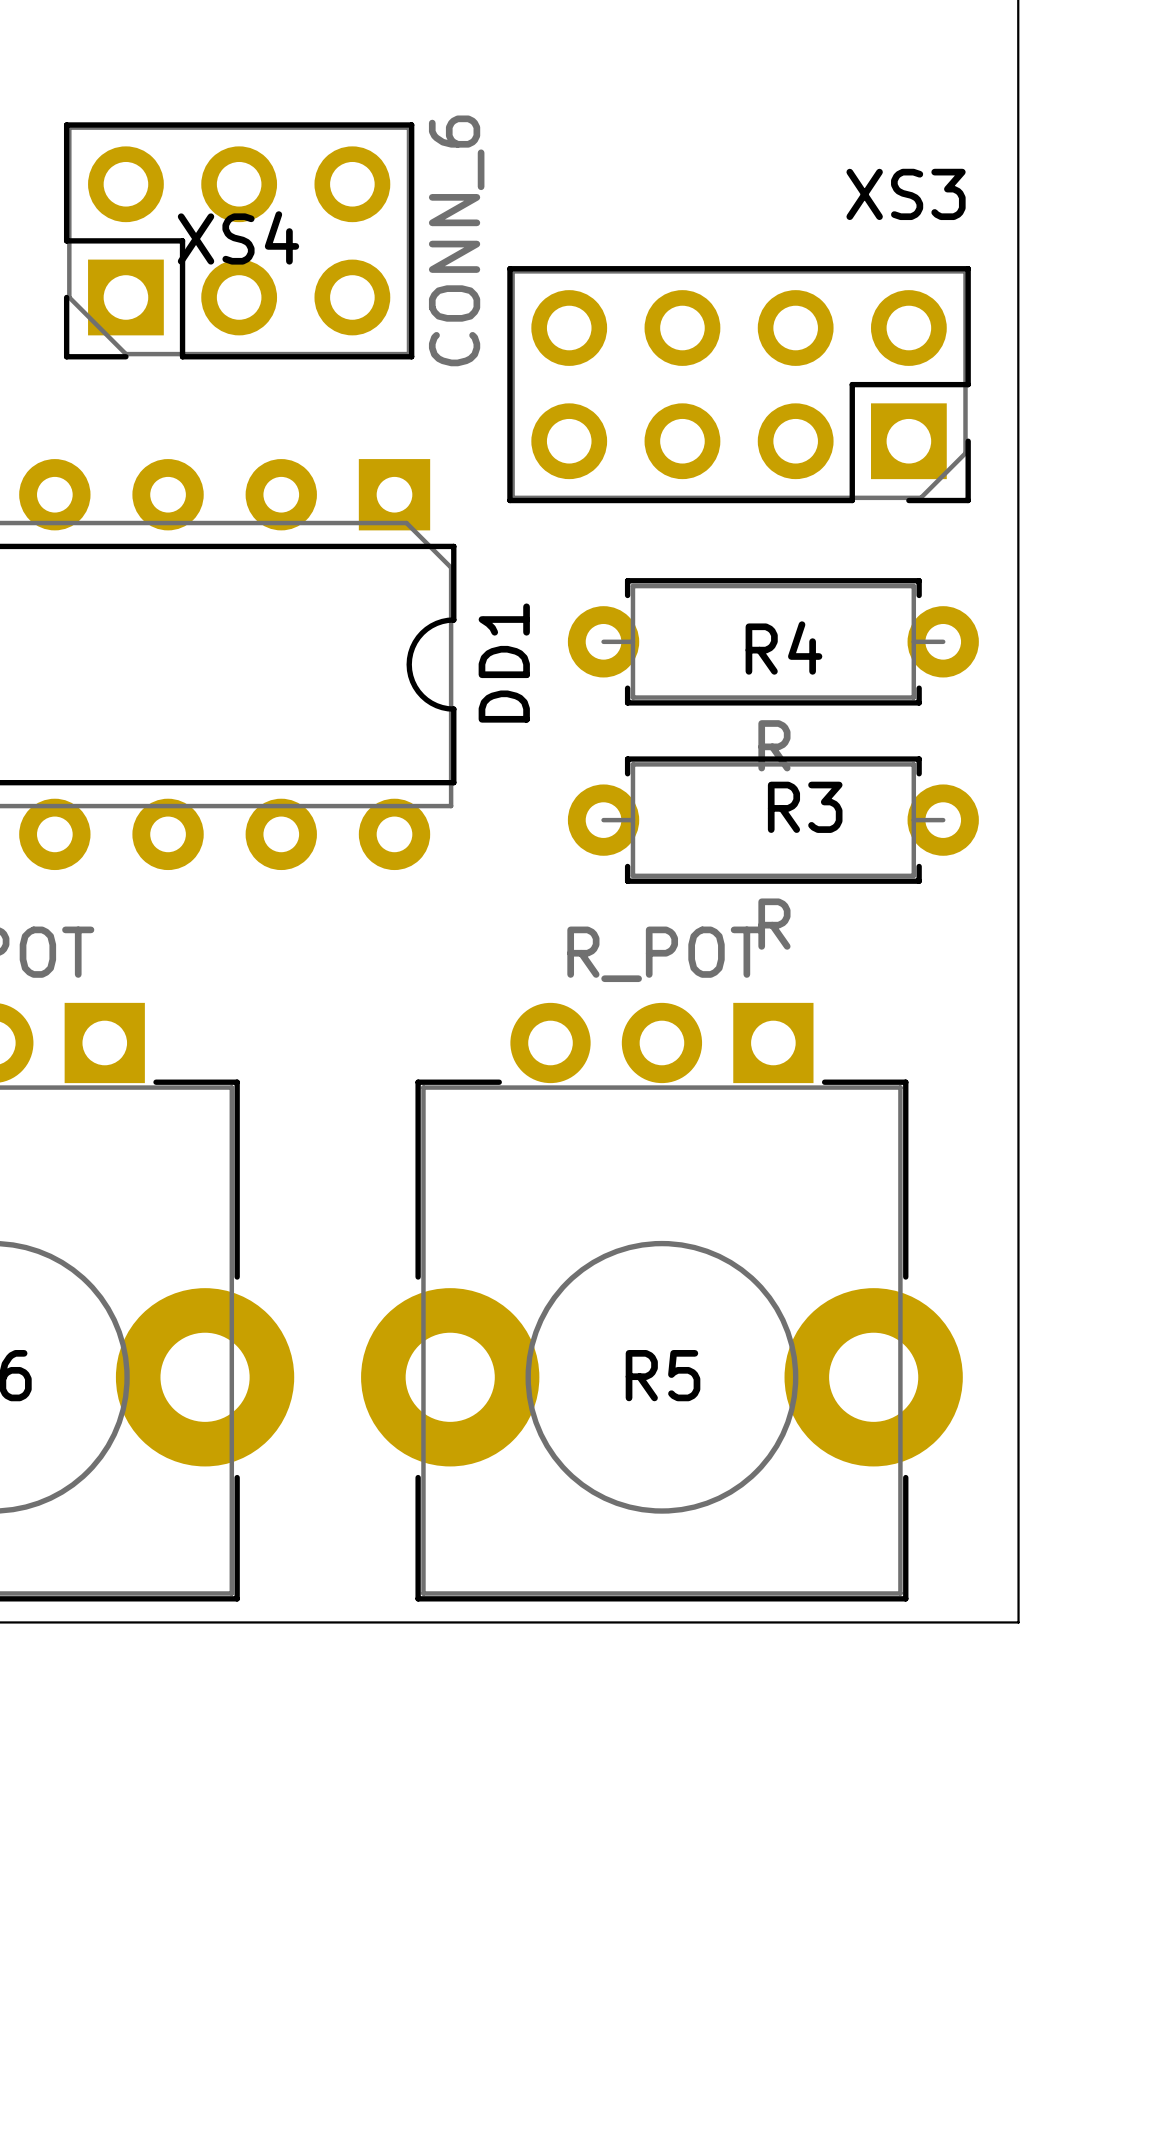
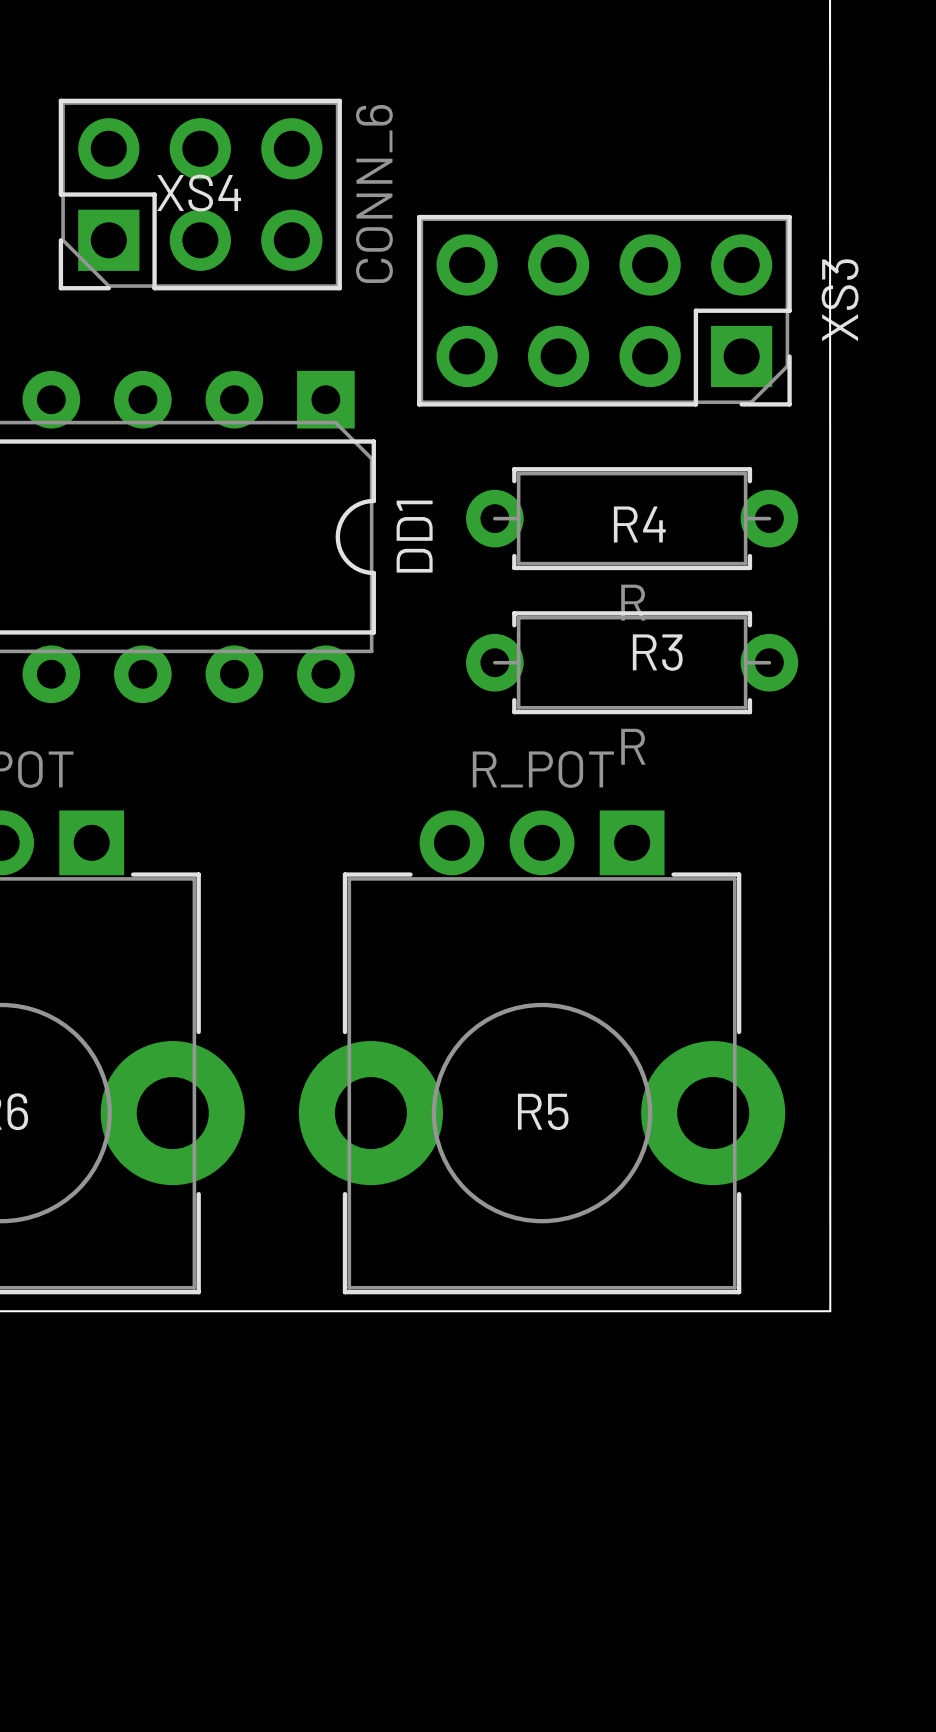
XS3 name rotation: 0° (906, 194) -> 90° counterclockwise (840, 300)
XS3 name position: XS3 (906, 194) -> XS3 (840, 300)

